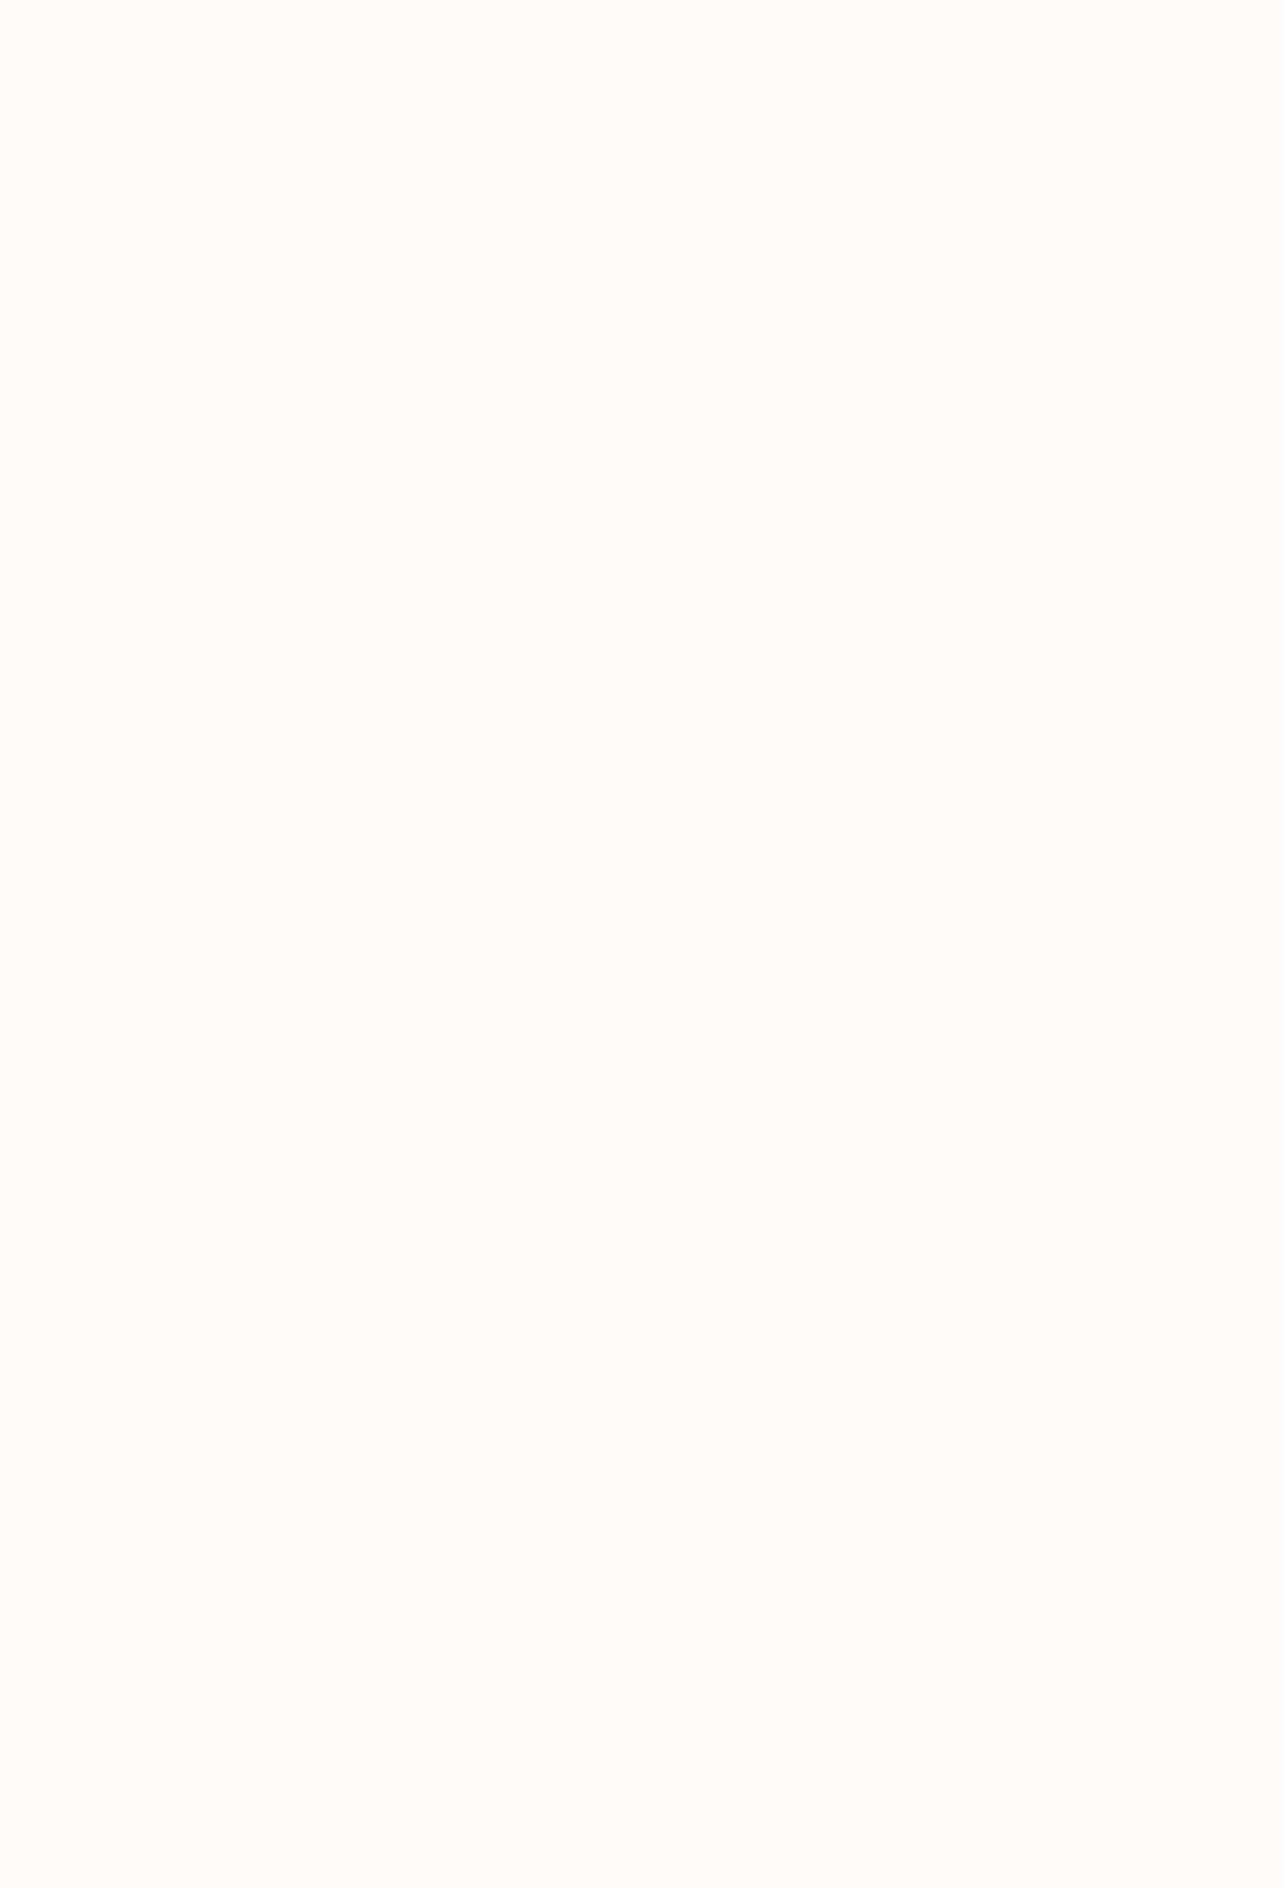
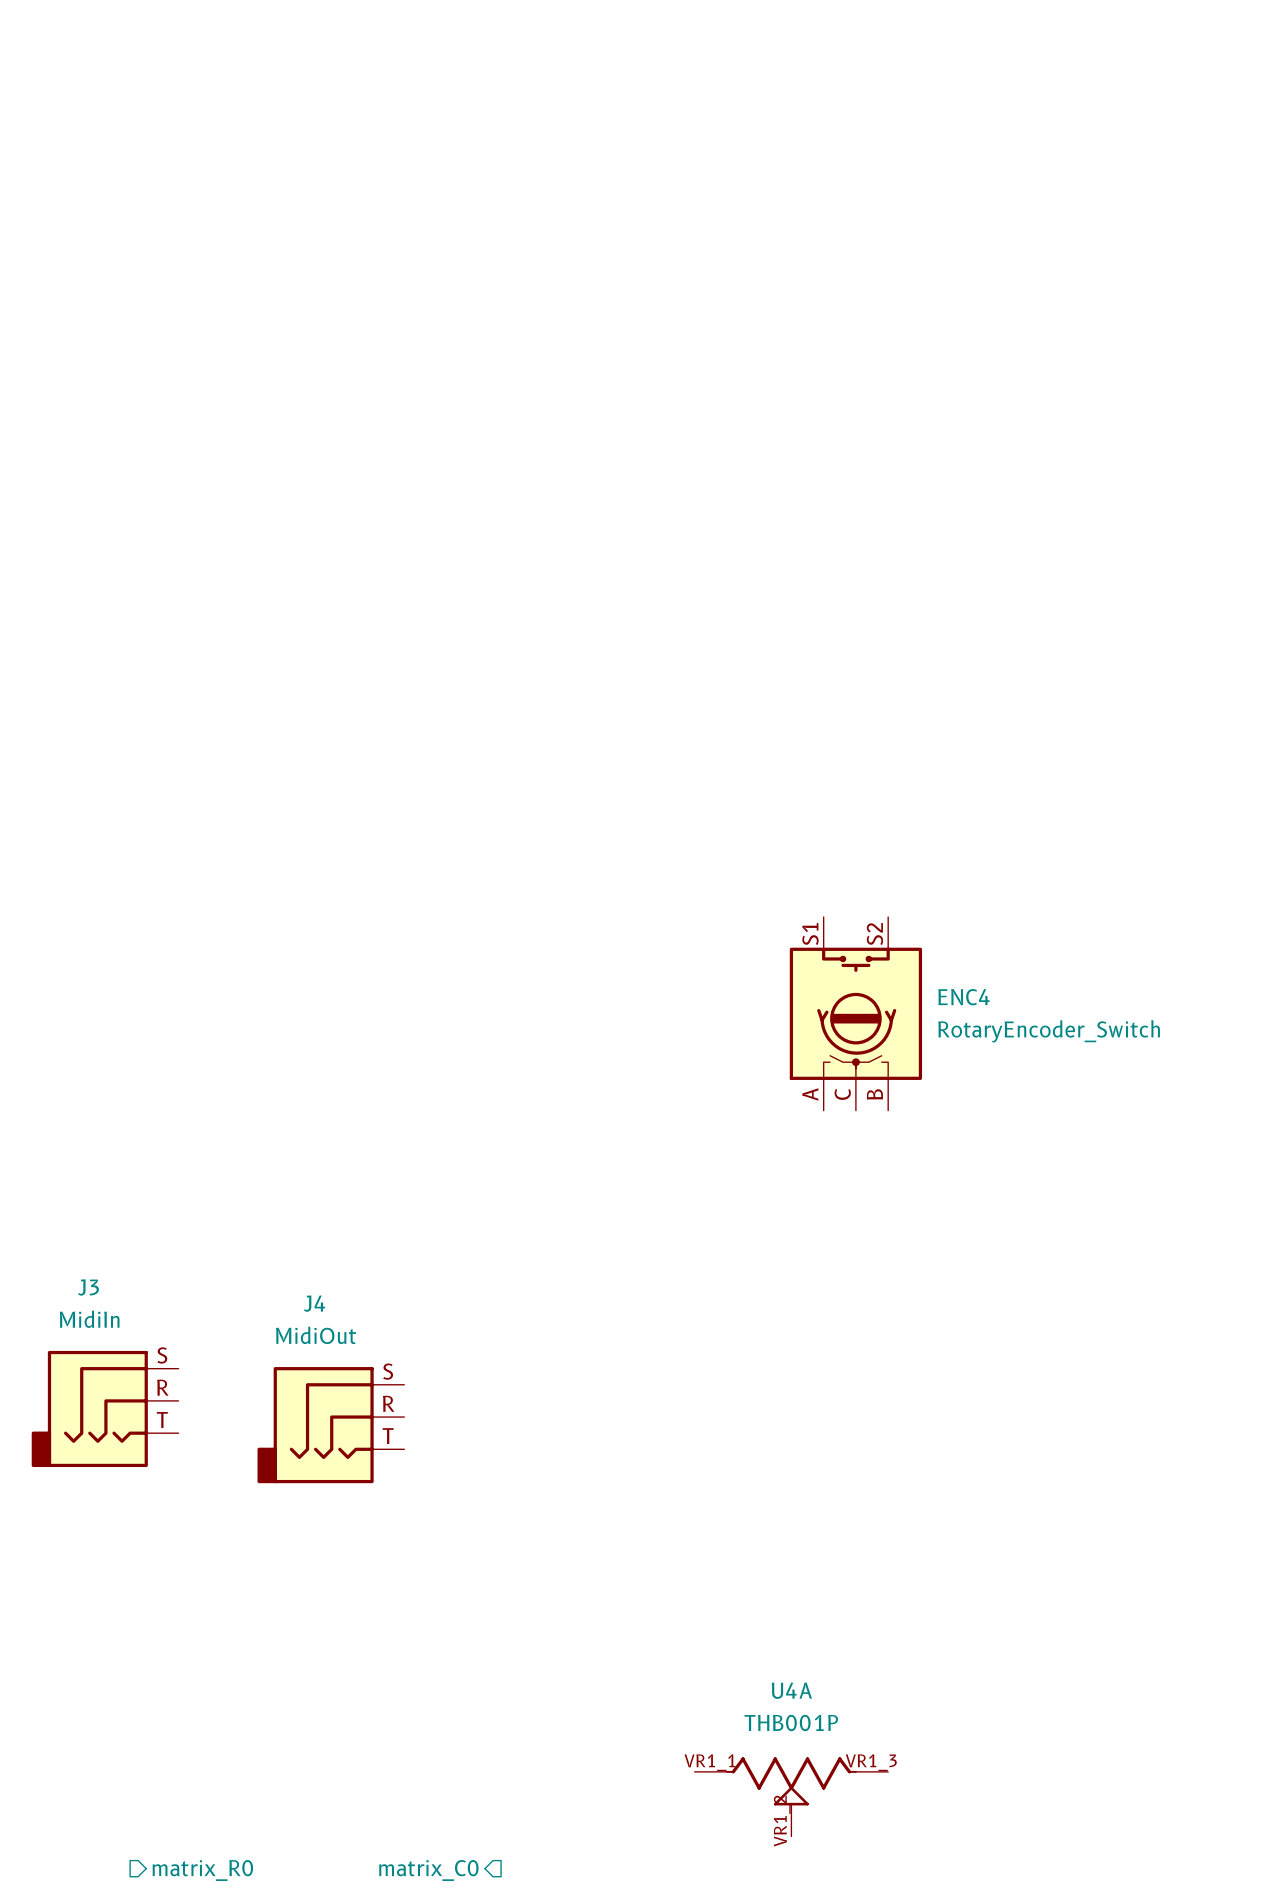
ENC4: none -> RotaryEncoder_Switch (855, 1013)
J3: none -> MidiIn (105, 1408)
J4: none -> MidiOut (330, 1425)
U4A: none -> THB001P (791, 1796)
sheet pin: none -> matrix_R0 (202, 1870)
sheet pin: none -> matrix_C0 (428, 1870)

